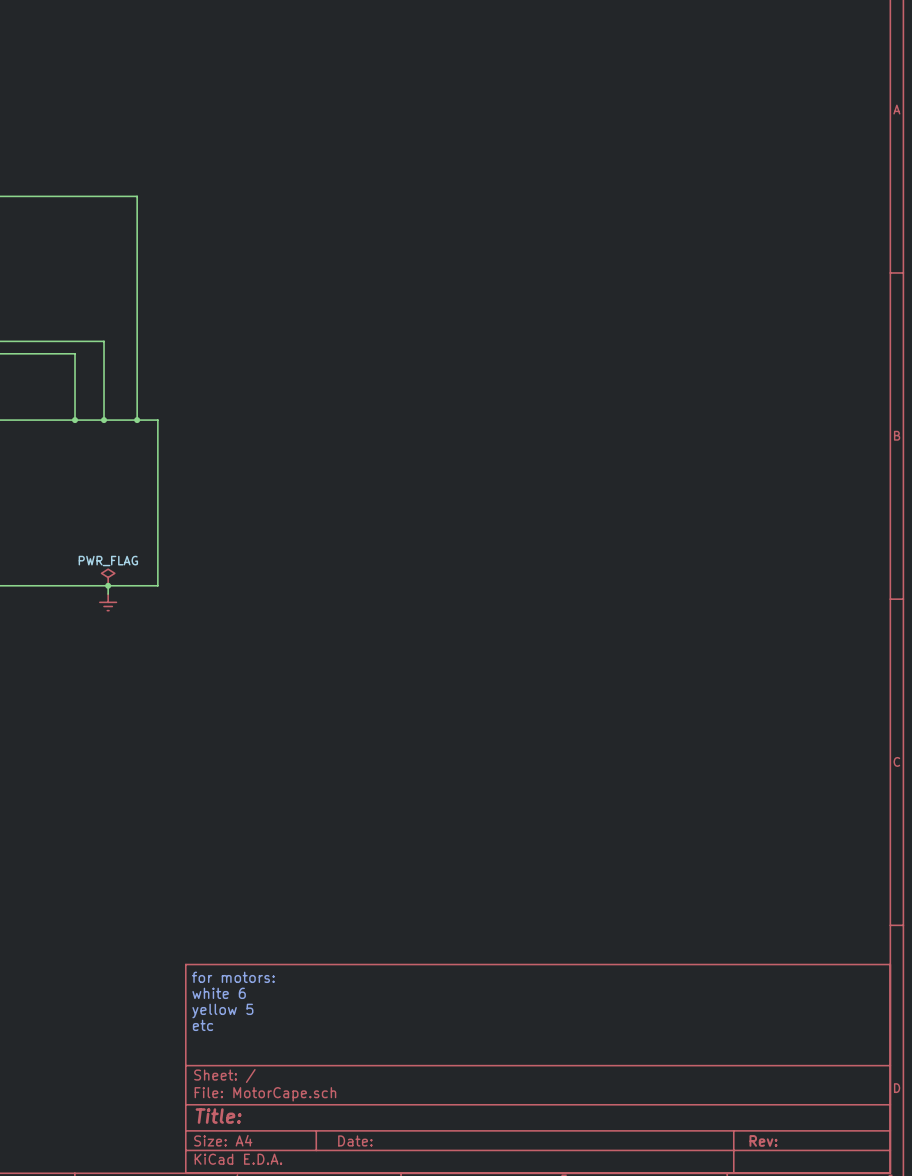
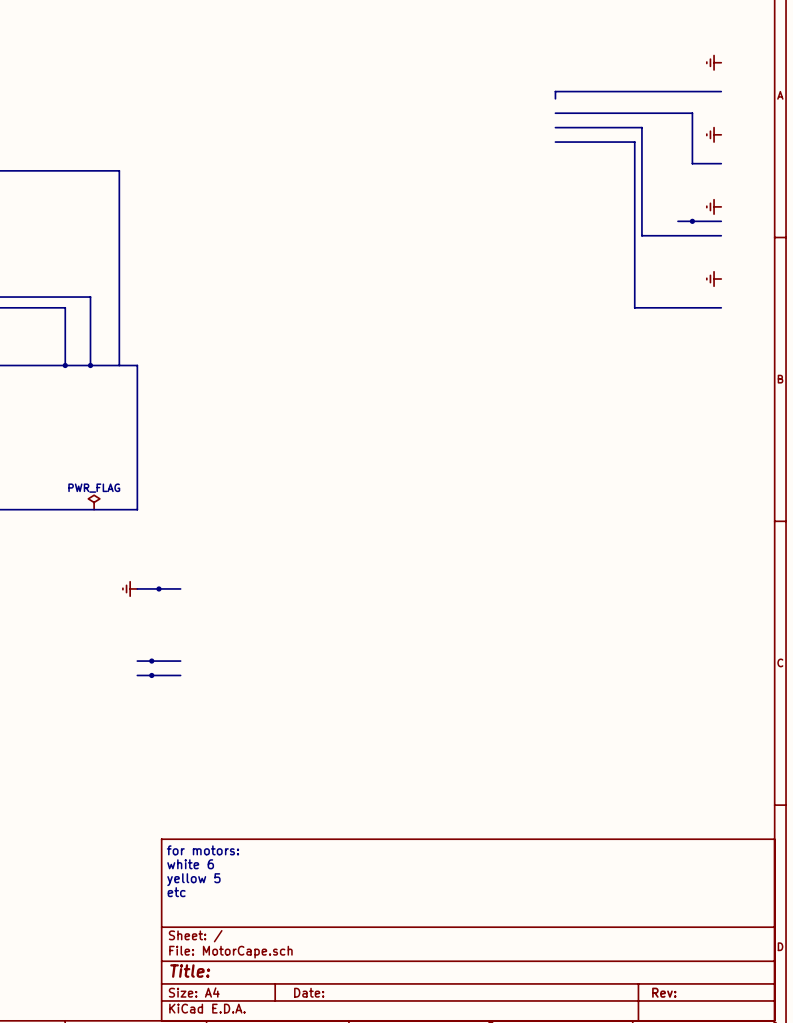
power symbol: none -> (714, 62)
wire: none -> (721, 91) (555, 91) (555, 98)
wire: none -> (555, 113) (692, 113) (692, 163) (721, 163)
wire: none -> (555, 127) (641, 127) (641, 235) (721, 235)
power symbol: none -> (714, 134)
wire: none -> (555, 142) (634, 142) (634, 307) (721, 307)
power symbol: none -> (714, 206)
wire: none -> (678, 221) (721, 221)
junction: none -> (692, 221)
power symbol: none -> (714, 279)
junction: (137, 420) -> none
wire: (108, 585) (108, 594) -> none
junction: (108, 585) -> none
power symbol rotation: 0° (108, 602) -> 90° clockwise (130, 588)
power symbol position: (108, 602) -> (130, 588)
wire: none -> (137, 588) (180, 588)
junction: none -> (158, 588)
wire: none -> (137, 661) (180, 661)
junction: none -> (151, 661)
wire: none -> (137, 675) (180, 675)
junction: none -> (151, 675)

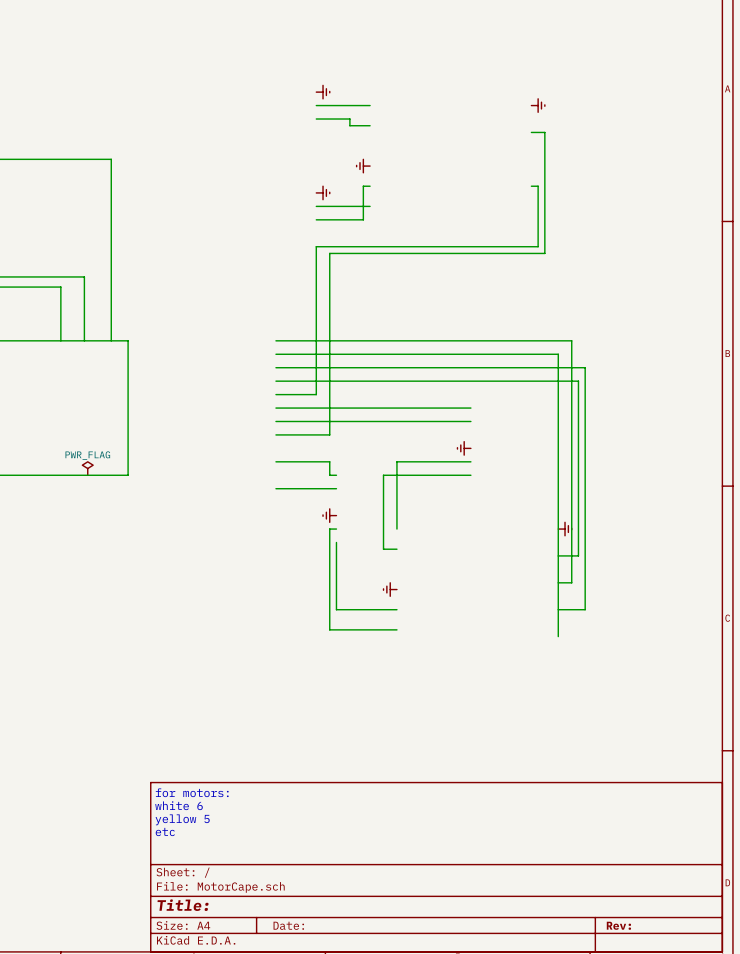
power symbol: (714, 62) -> none
wire: (721, 91) (555, 91) (555, 98) -> none
power symbol: none -> (323, 92)
wire: none -> (316, 105) (370, 105)
wire: (555, 113) (692, 113) (692, 163) (721, 163) -> none
power symbol: none -> (538, 105)
wire: none -> (316, 119) (349, 119) (349, 125) (370, 125)
wire: (555, 127) (641, 127) (641, 235) (721, 235) -> none
power symbol: (714, 134) -> none
wire: (555, 142) (569, 142) -> none
wire: (584, 142) (634, 142) (634, 307) (721, 307) -> (544, 132) (544, 253) (329, 253) (329, 434) (275, 434)
power symbol: none -> (363, 166)
wire: none -> (370, 186) (363, 186) (363, 219) (316, 219)
wire: none -> (531, 186) (538, 186) (538, 246) (316, 246) (316, 394) (275, 394)
power symbol: none -> (323, 192)
power symbol: (714, 206) -> none
wire: none -> (316, 206) (370, 206)
wire: (678, 221) (721, 221) -> none
junction: (692, 221) -> none
power symbol: (714, 279) -> none
junction: (65, 365) -> none
junction: (90, 365) -> none
wire: none -> (275, 340) (571, 340) (571, 582) (558, 582)
wire: none -> (275, 354) (558, 354) (558, 636)
wire: none -> (275, 367) (585, 367) (585, 609) (558, 609)
wire: none -> (275, 381) (578, 381) (578, 555) (558, 555)
wire: none -> (275, 408) (470, 408)
wire: none -> (275, 421) (470, 421)
power symbol: none -> (464, 448)
wire: none -> (275, 461) (329, 461) (329, 475) (336, 475)
wire: none -> (470, 461) (396, 461) (396, 529)
wire: none -> (470, 475) (383, 475) (383, 549) (396, 549)
wire: none -> (275, 488) (336, 488)
power symbol: none -> (329, 515)
wire: none -> (336, 529) (329, 529) (329, 629) (396, 629)
power symbol: none -> (565, 529)
wire: none -> (336, 542) (336, 609) (396, 609)
power symbol: (130, 588) -> none
wire: (137, 588) (180, 588) -> none
junction: (158, 588) -> none
power symbol: none -> (390, 589)
wire: (137, 661) (180, 661) -> none
junction: (151, 661) -> none
wire: (137, 675) (180, 675) -> none
junction: (151, 675) -> none

